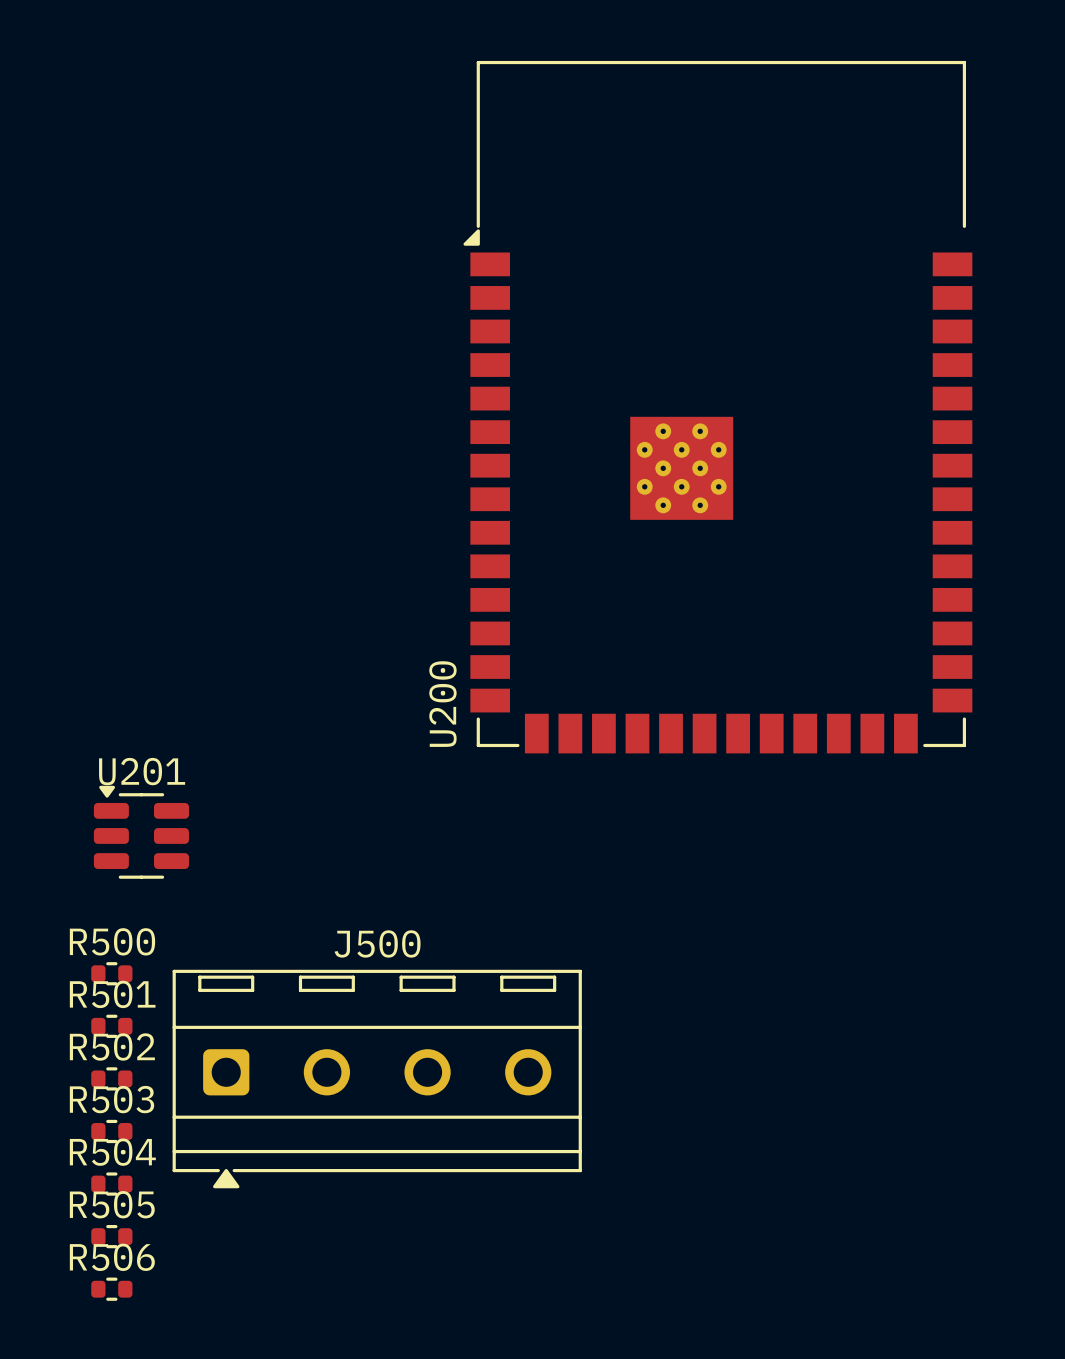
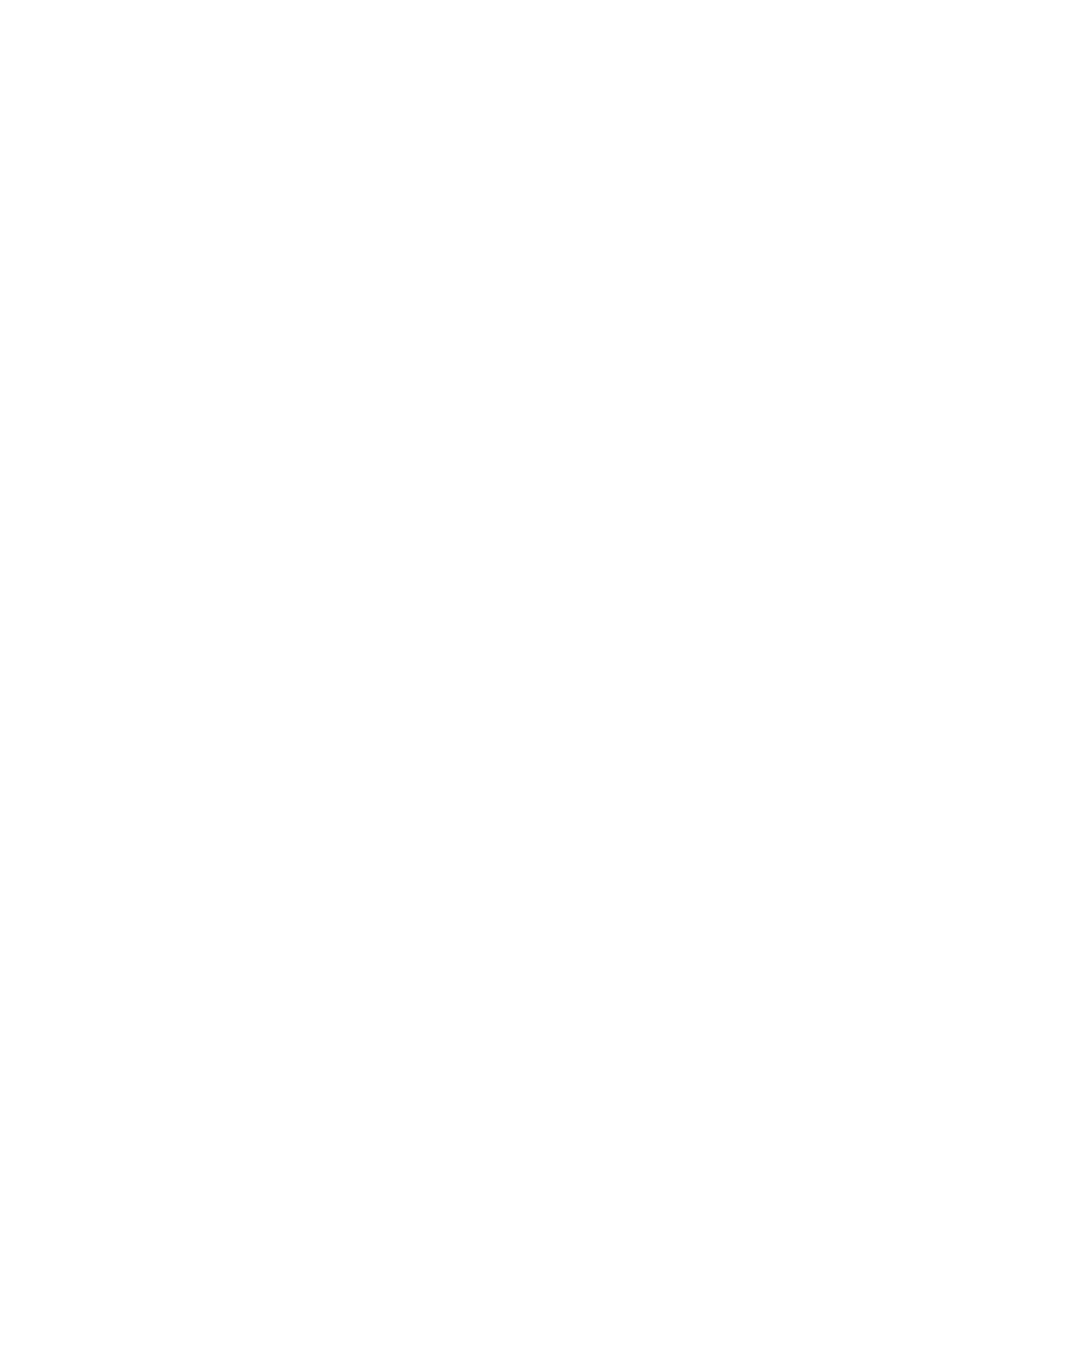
U200: (717, 407) -> none
U201: (141, 832) -> none
R500: (111, 973) -> none
R501: (111, 1026) -> none
R502: (111, 1078) -> none
J500: (377, 1079) -> none
R503: (111, 1131) -> none
R504: (111, 1184) -> none
R505: (111, 1236) -> none
R506: (111, 1289) -> none

